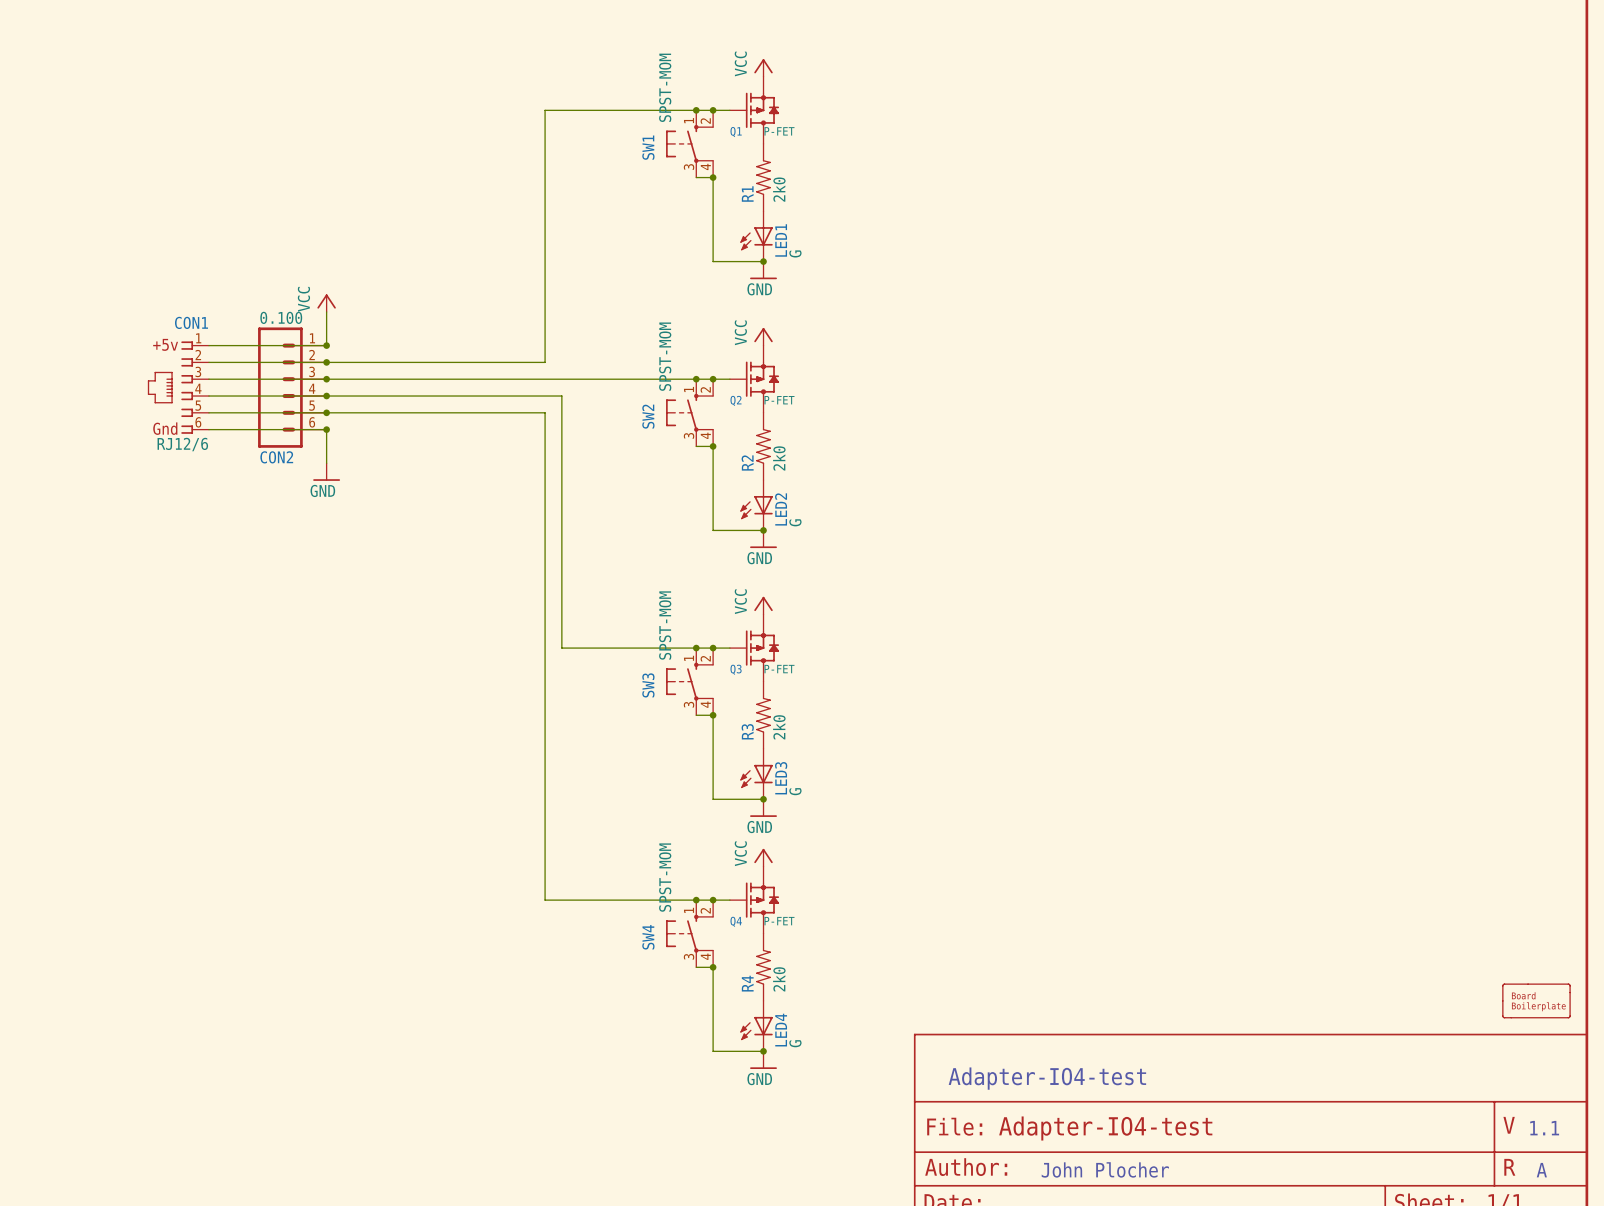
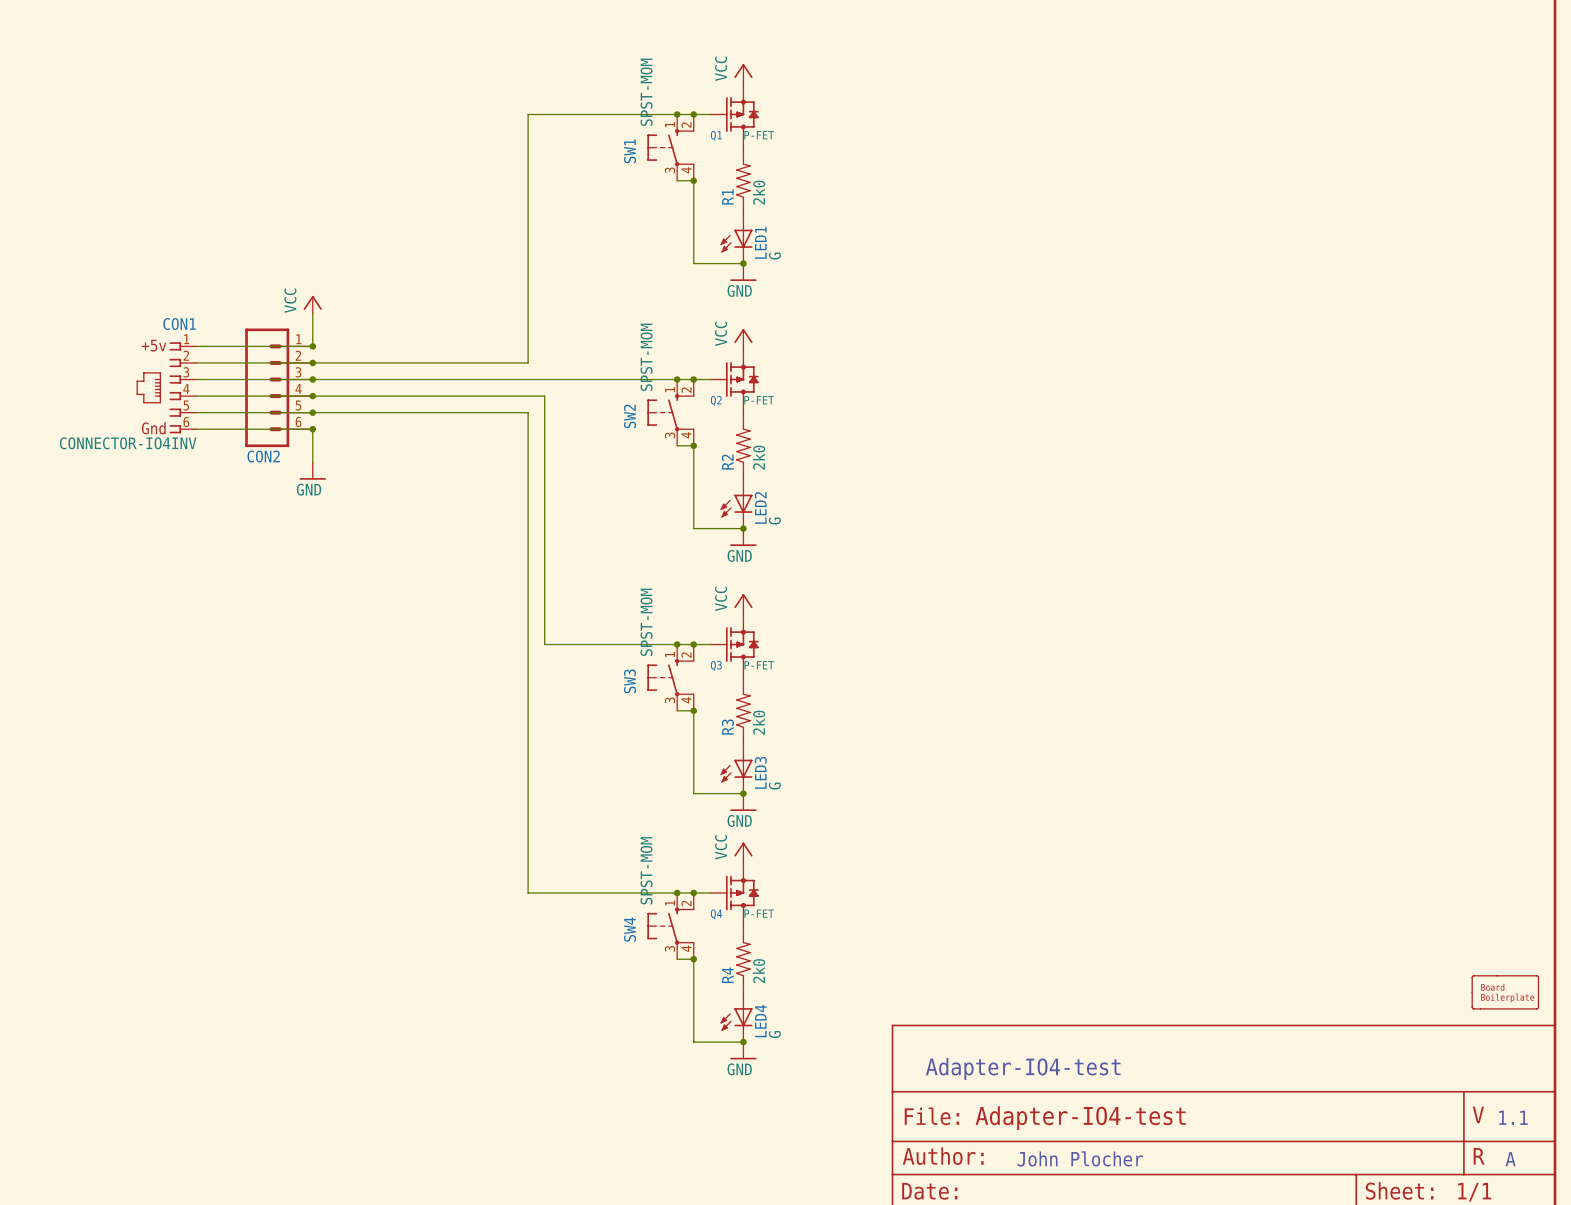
CON2 value: 0.100 (281, 317) -> none
CON1 value: RJ12/6 (182, 444) -> CONNECTOR-IO4INV (128, 443)

